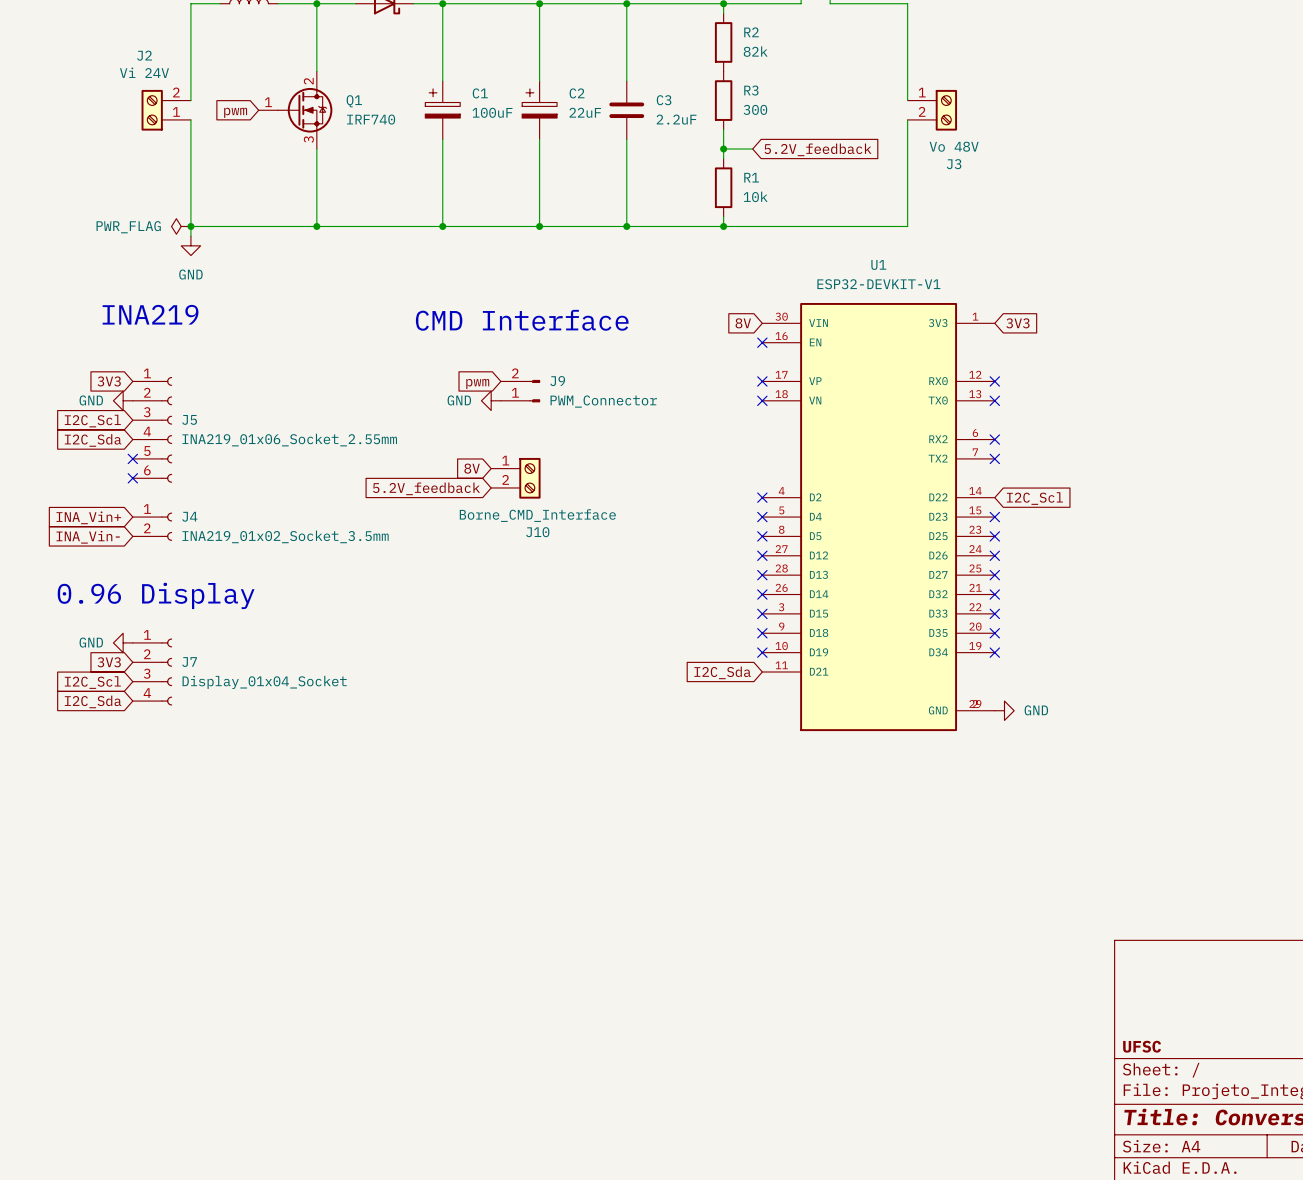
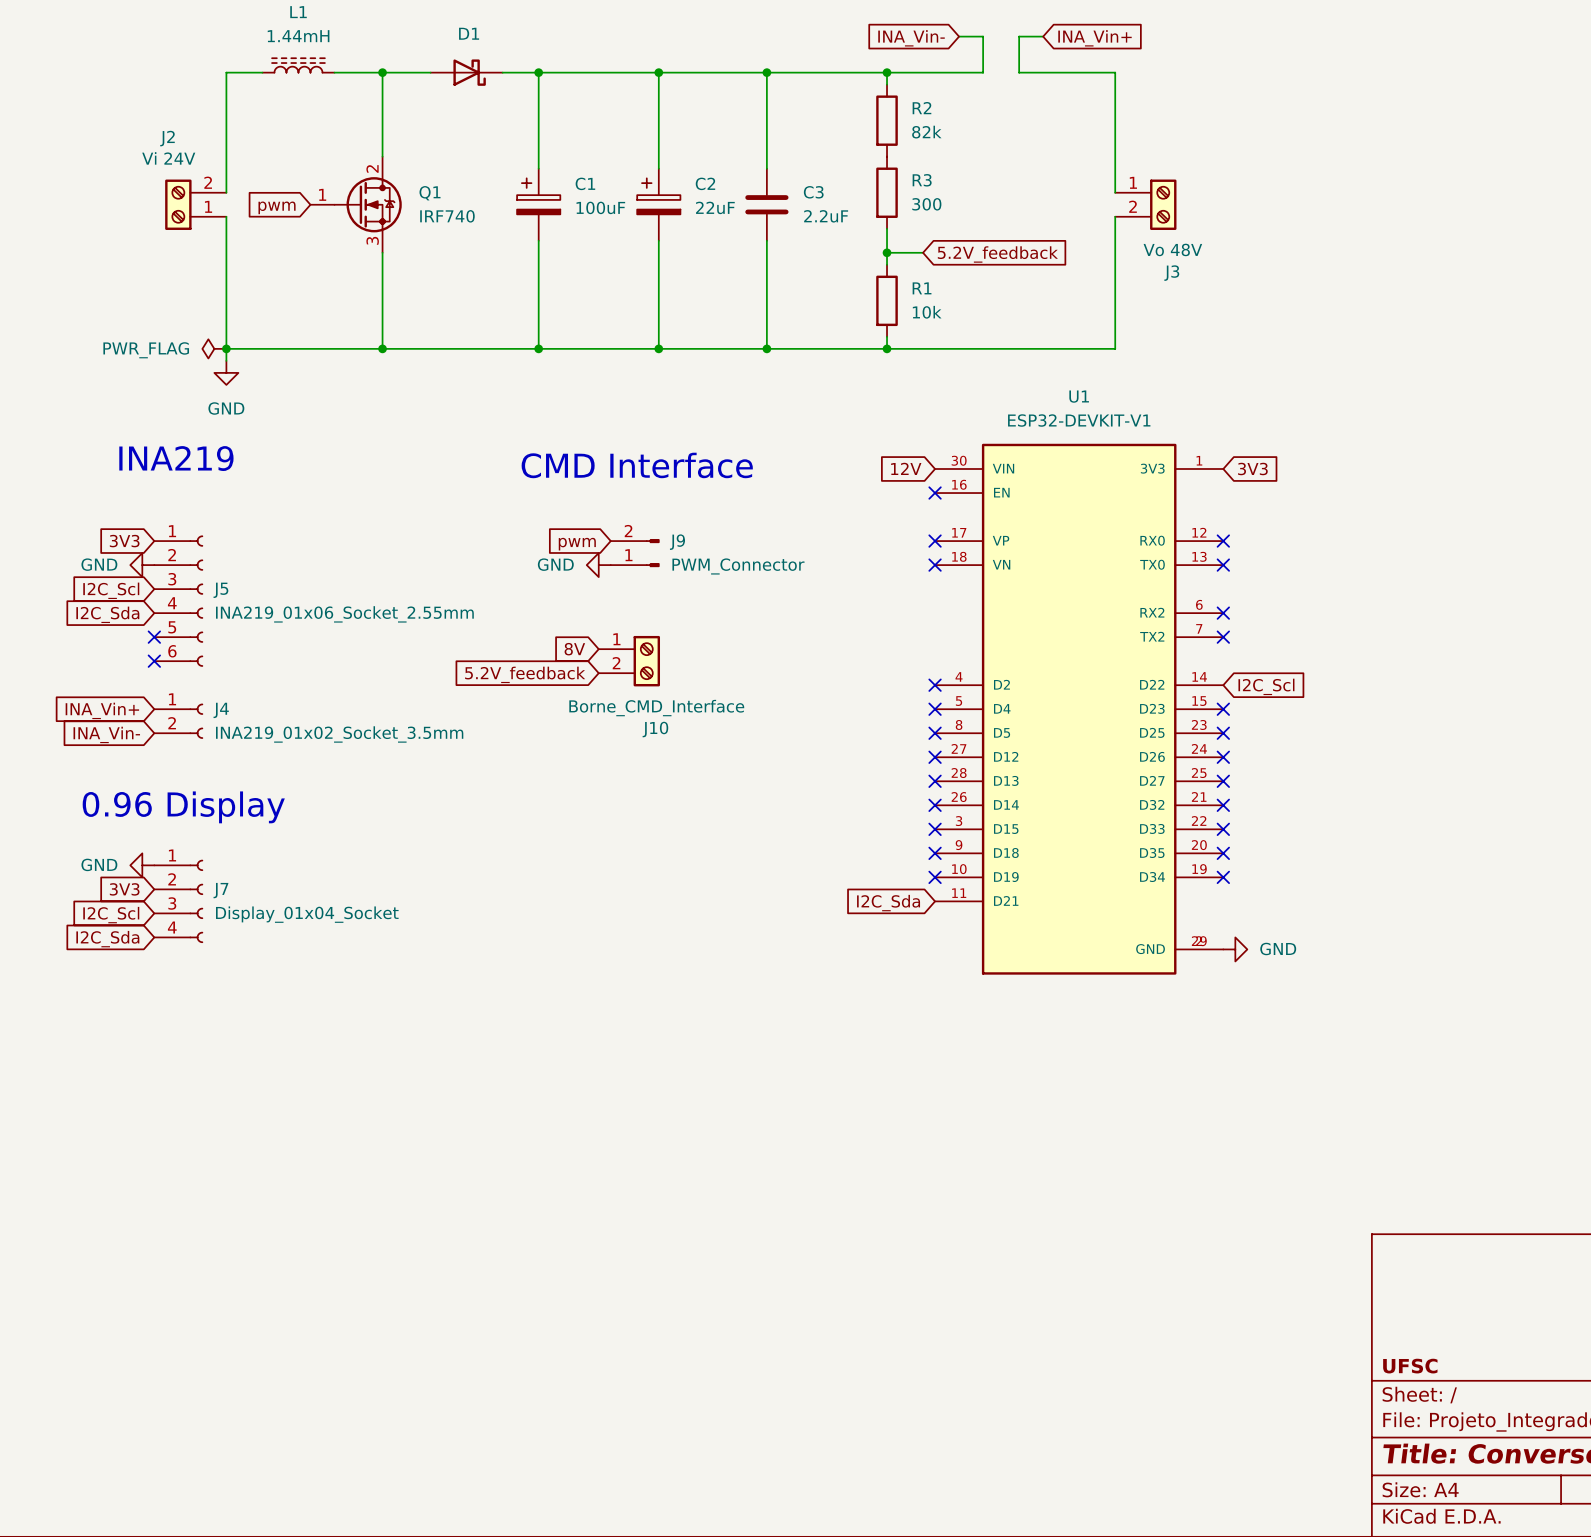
global label: 8V (743, 323) -> 12V (906, 468)

